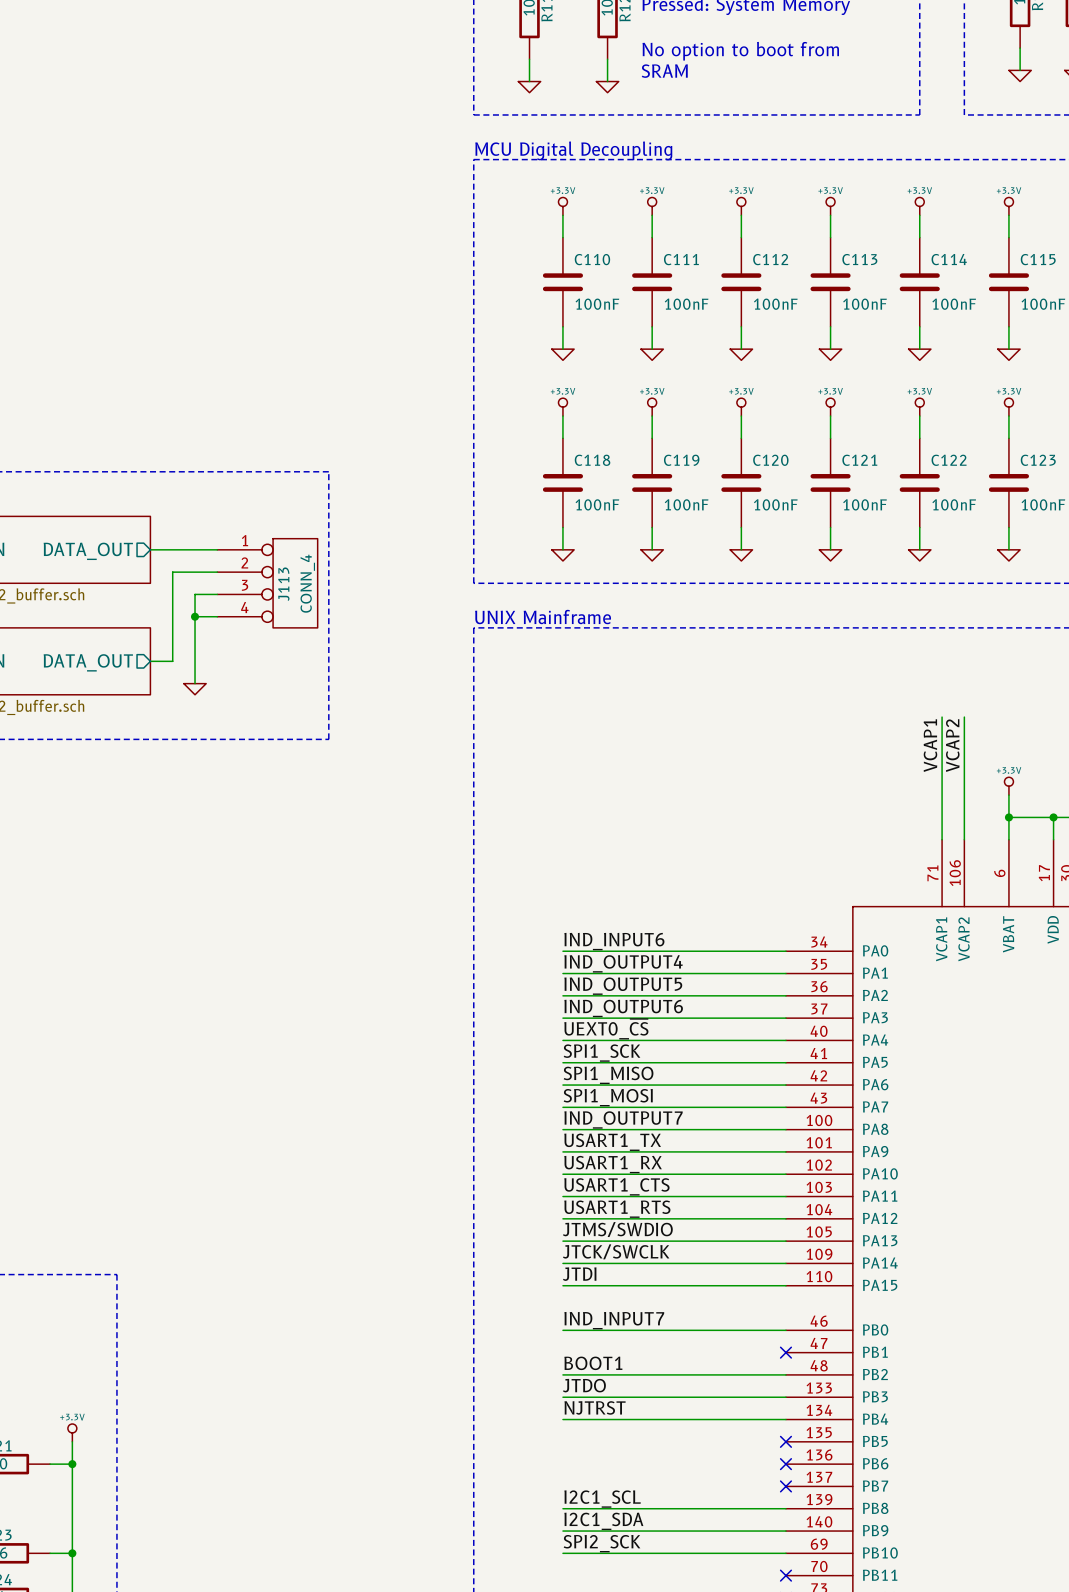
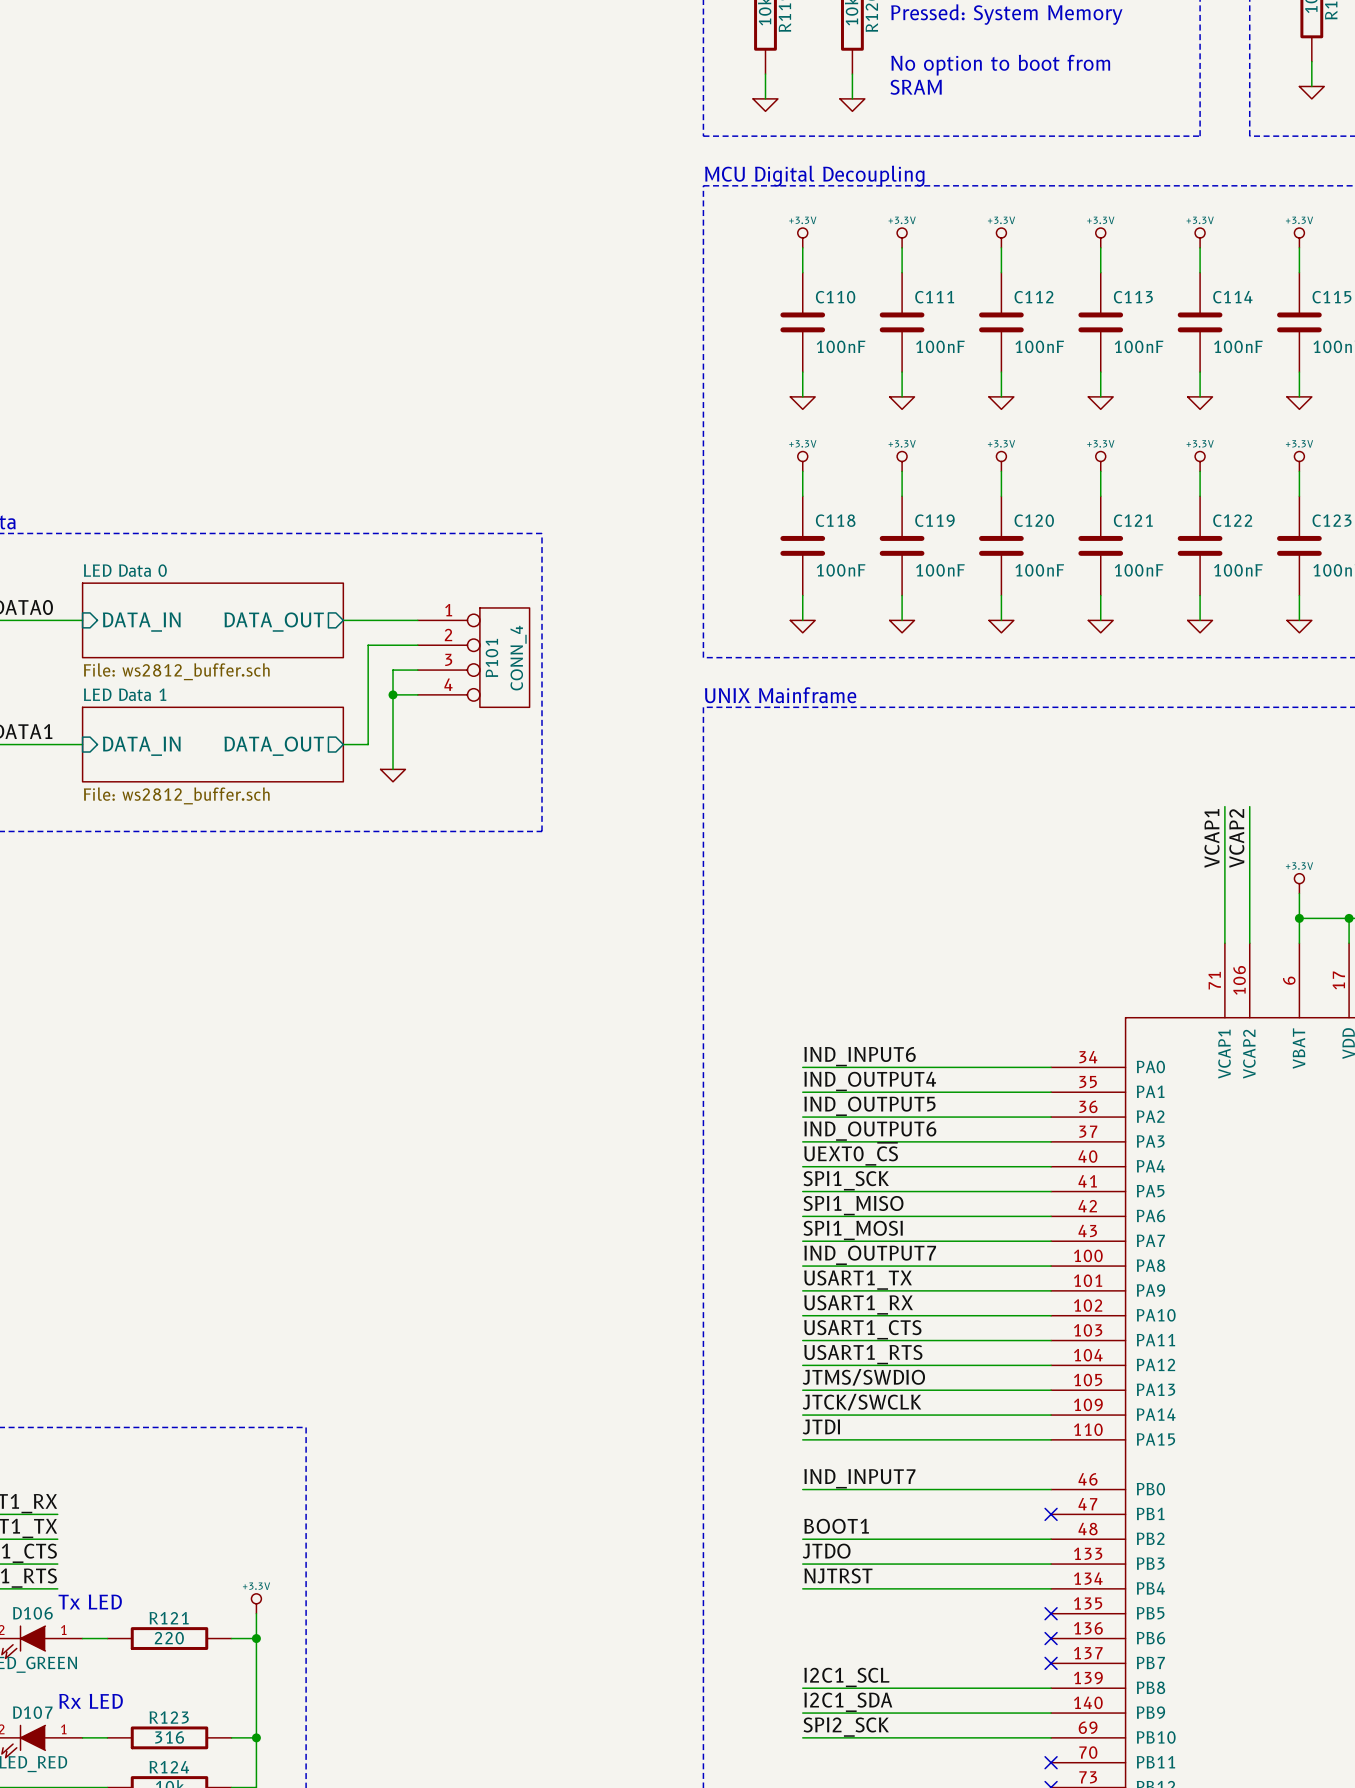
J113 name: J113 (283, 584) -> P101 (491, 658)

